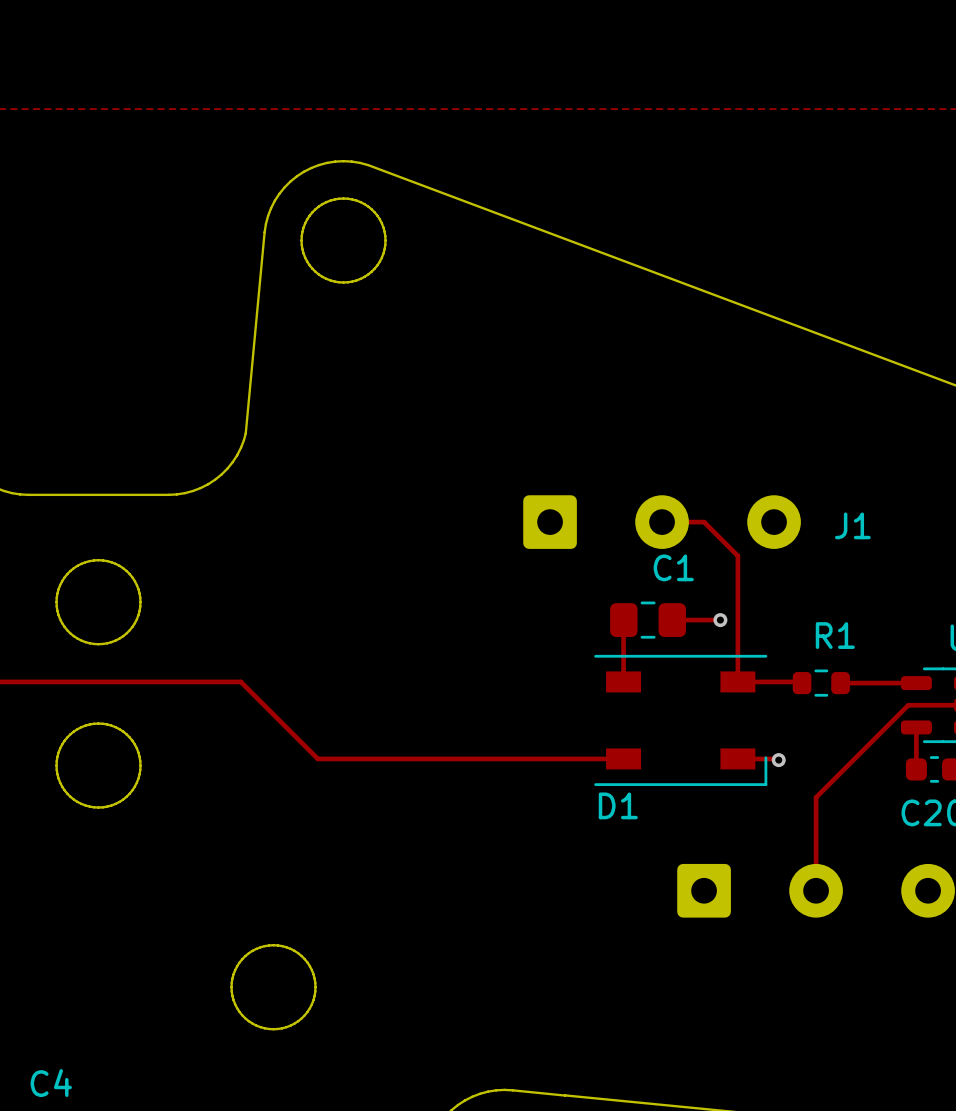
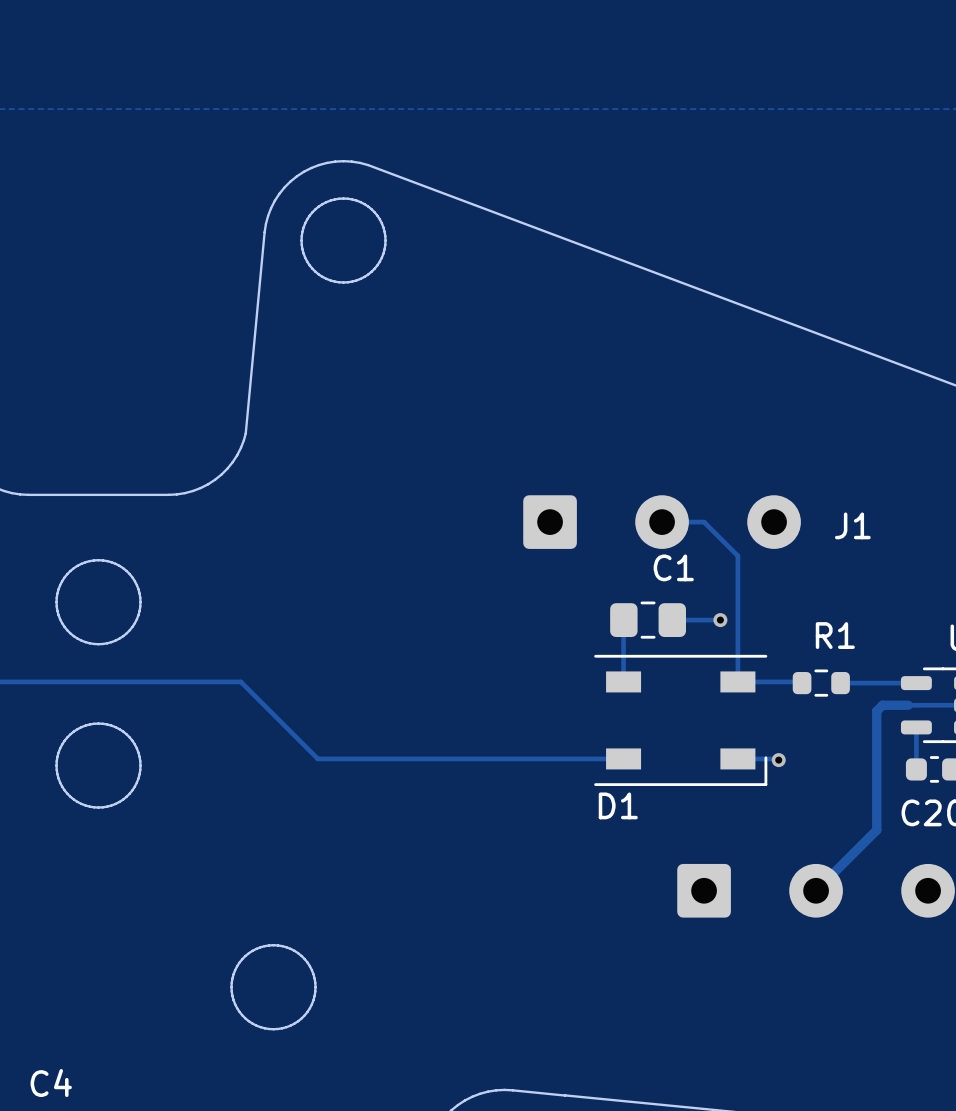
track: (908, 705) (816, 797) (816, 890) -> (908, 705) (882, 705) (876, 711) (876, 830) (816, 890)

